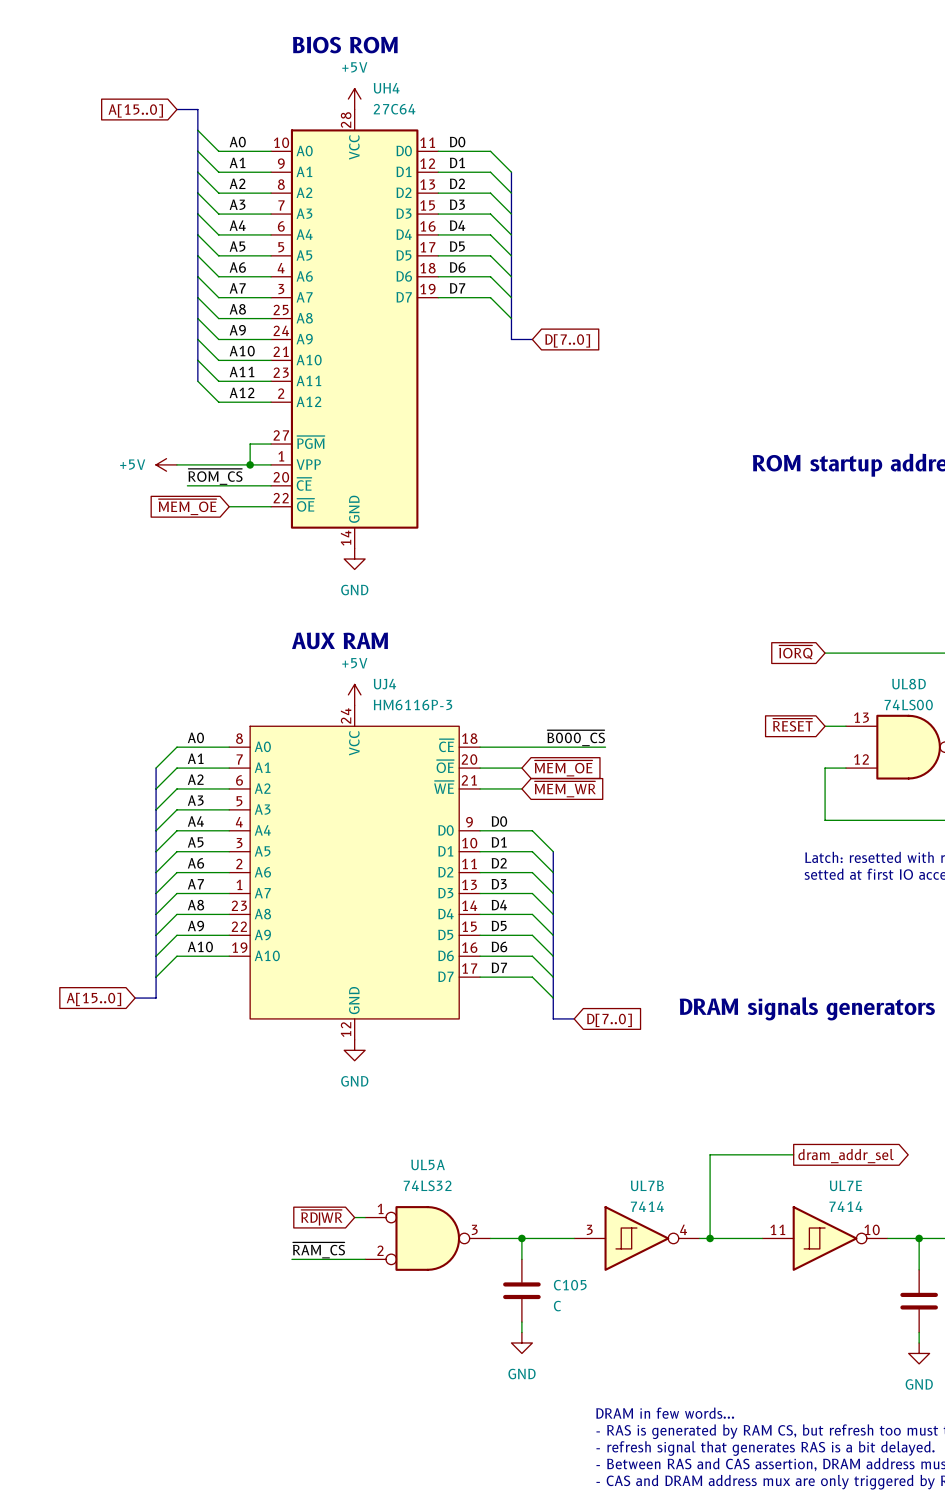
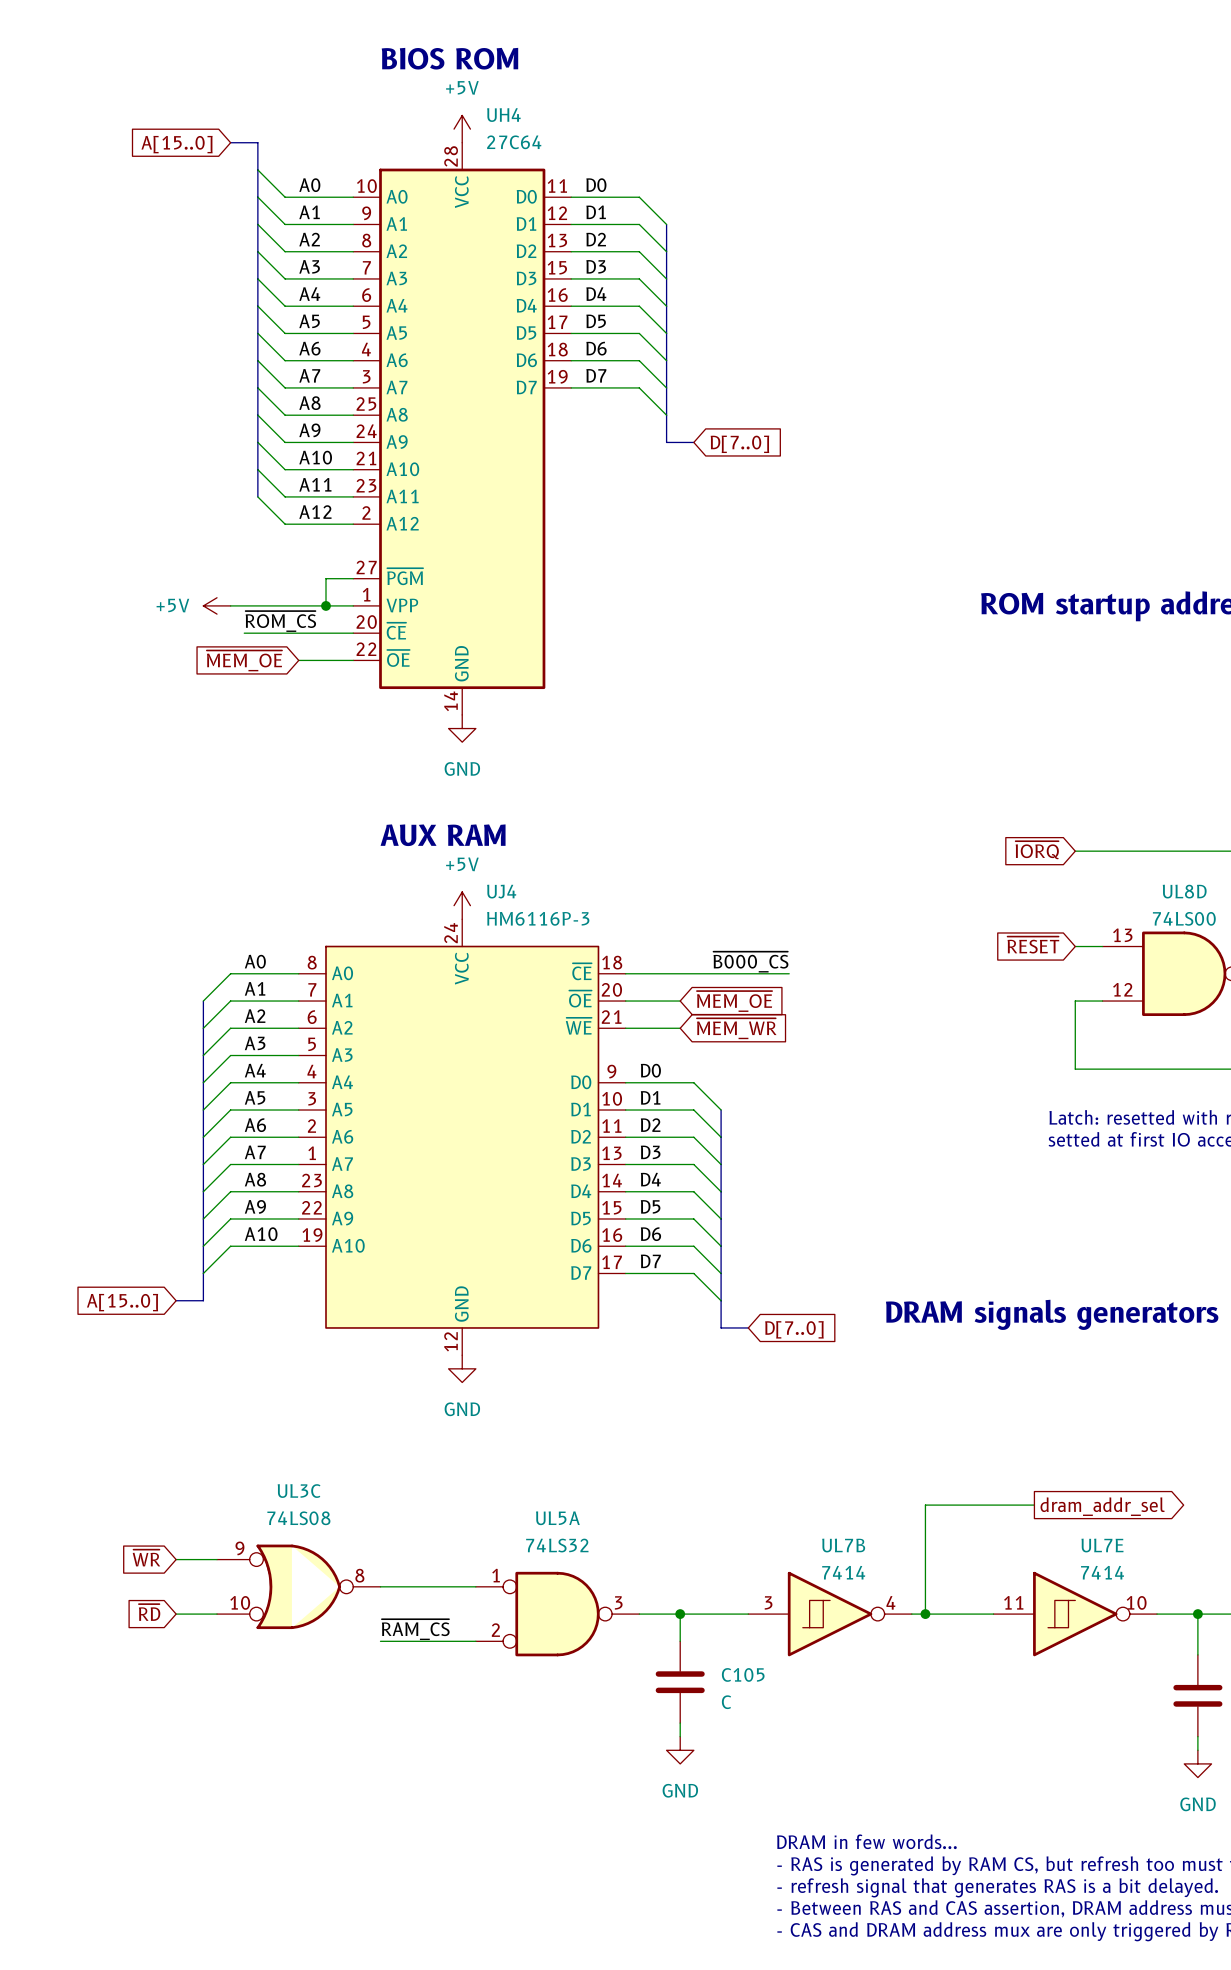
global label: none -> ~{WR} (146, 1558)
wire: none -> (176, 1559) (217, 1559)
UL3C: none -> 74LS08 (298, 1586)
wire: none -> (380, 1586) (462, 1586)
global label: ~{RD|WR} (321, 1217) -> none
global label: none -> ~{RD} (149, 1612)
wire: none -> (176, 1614) (217, 1614)

